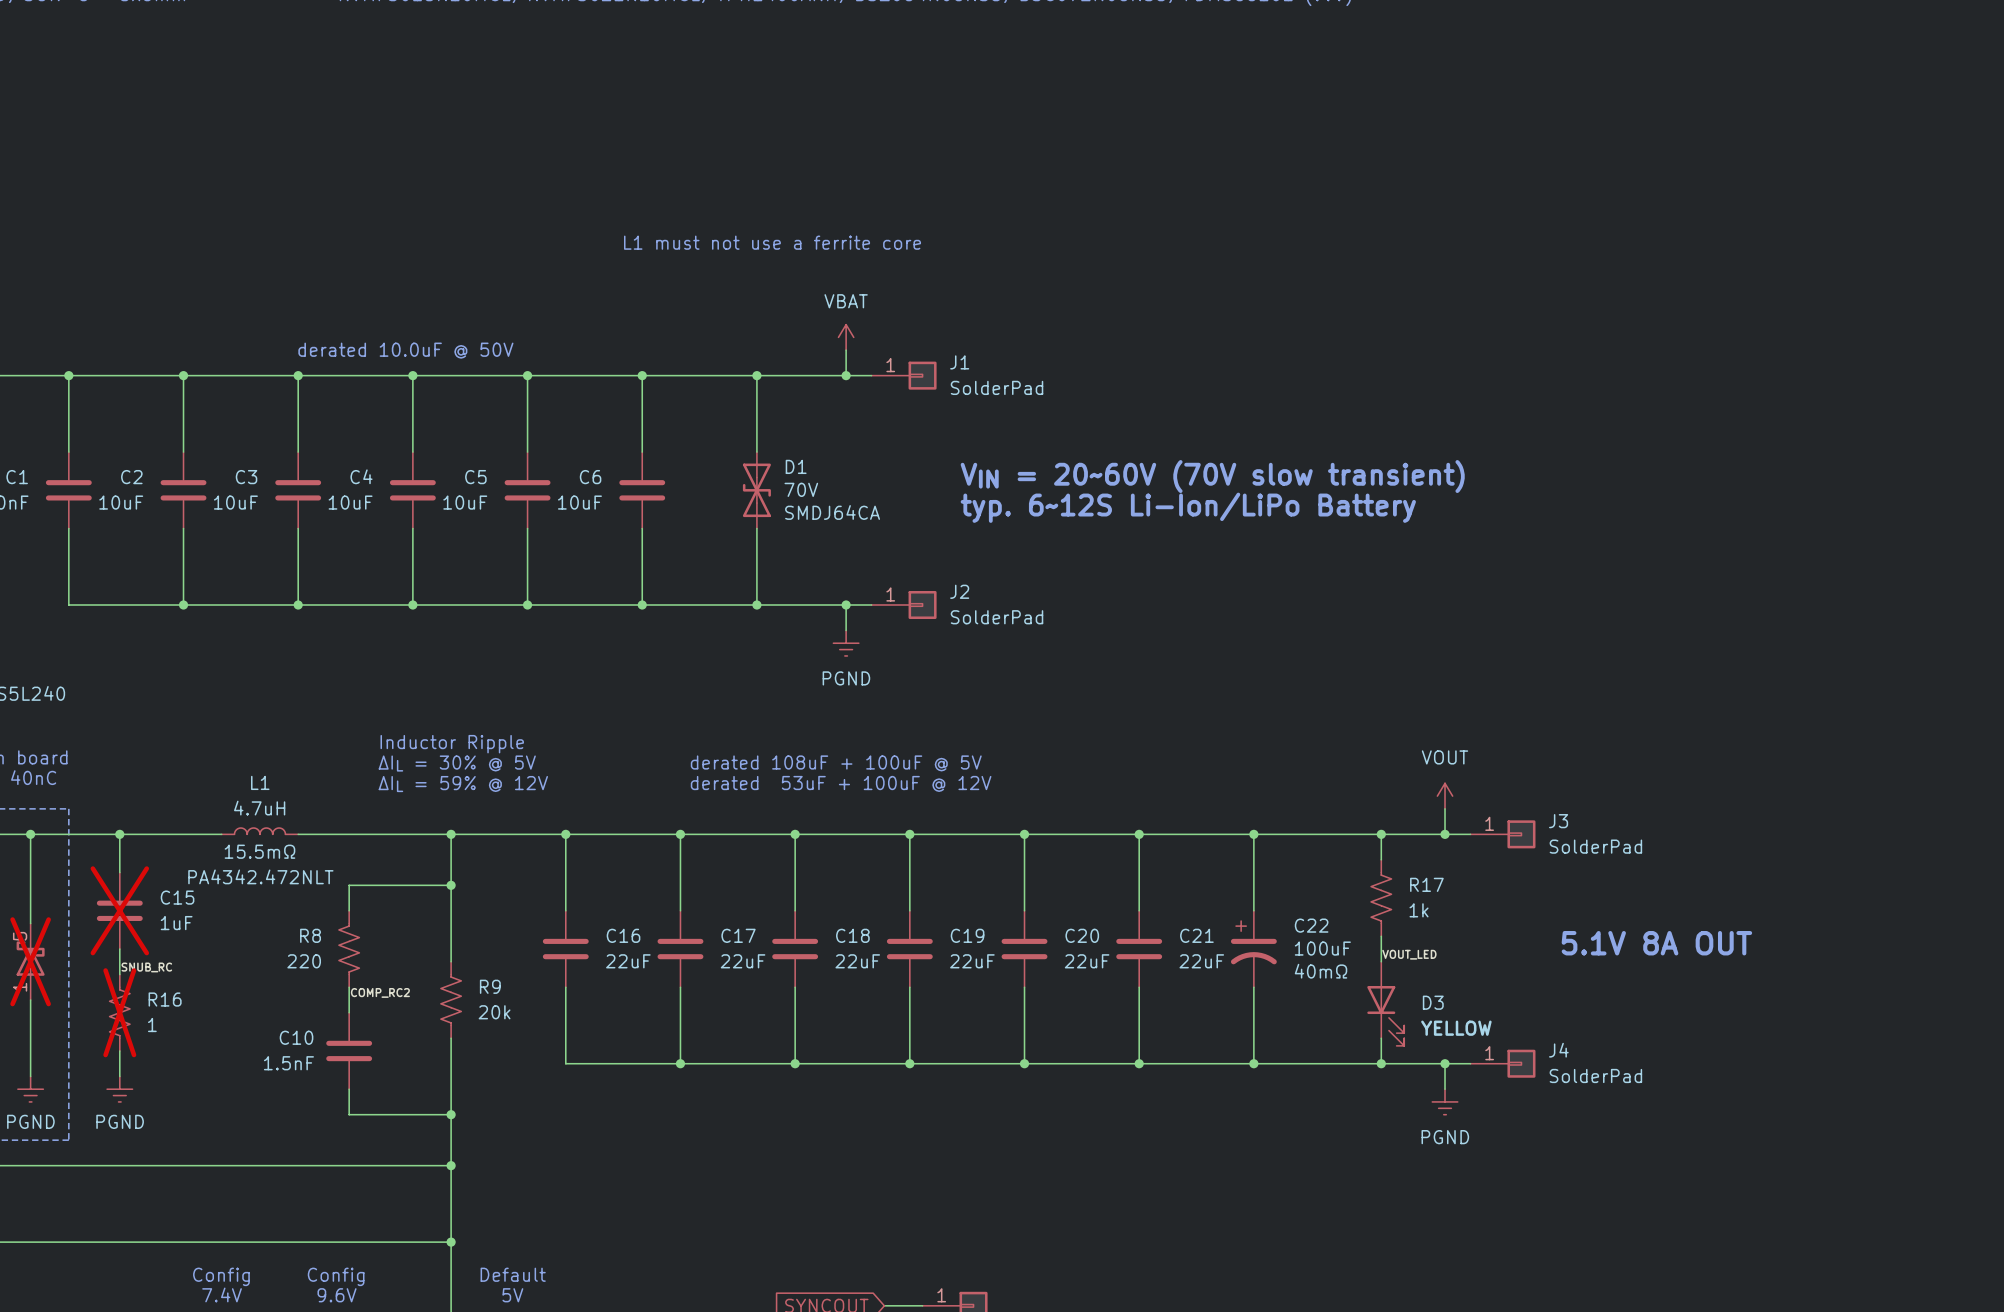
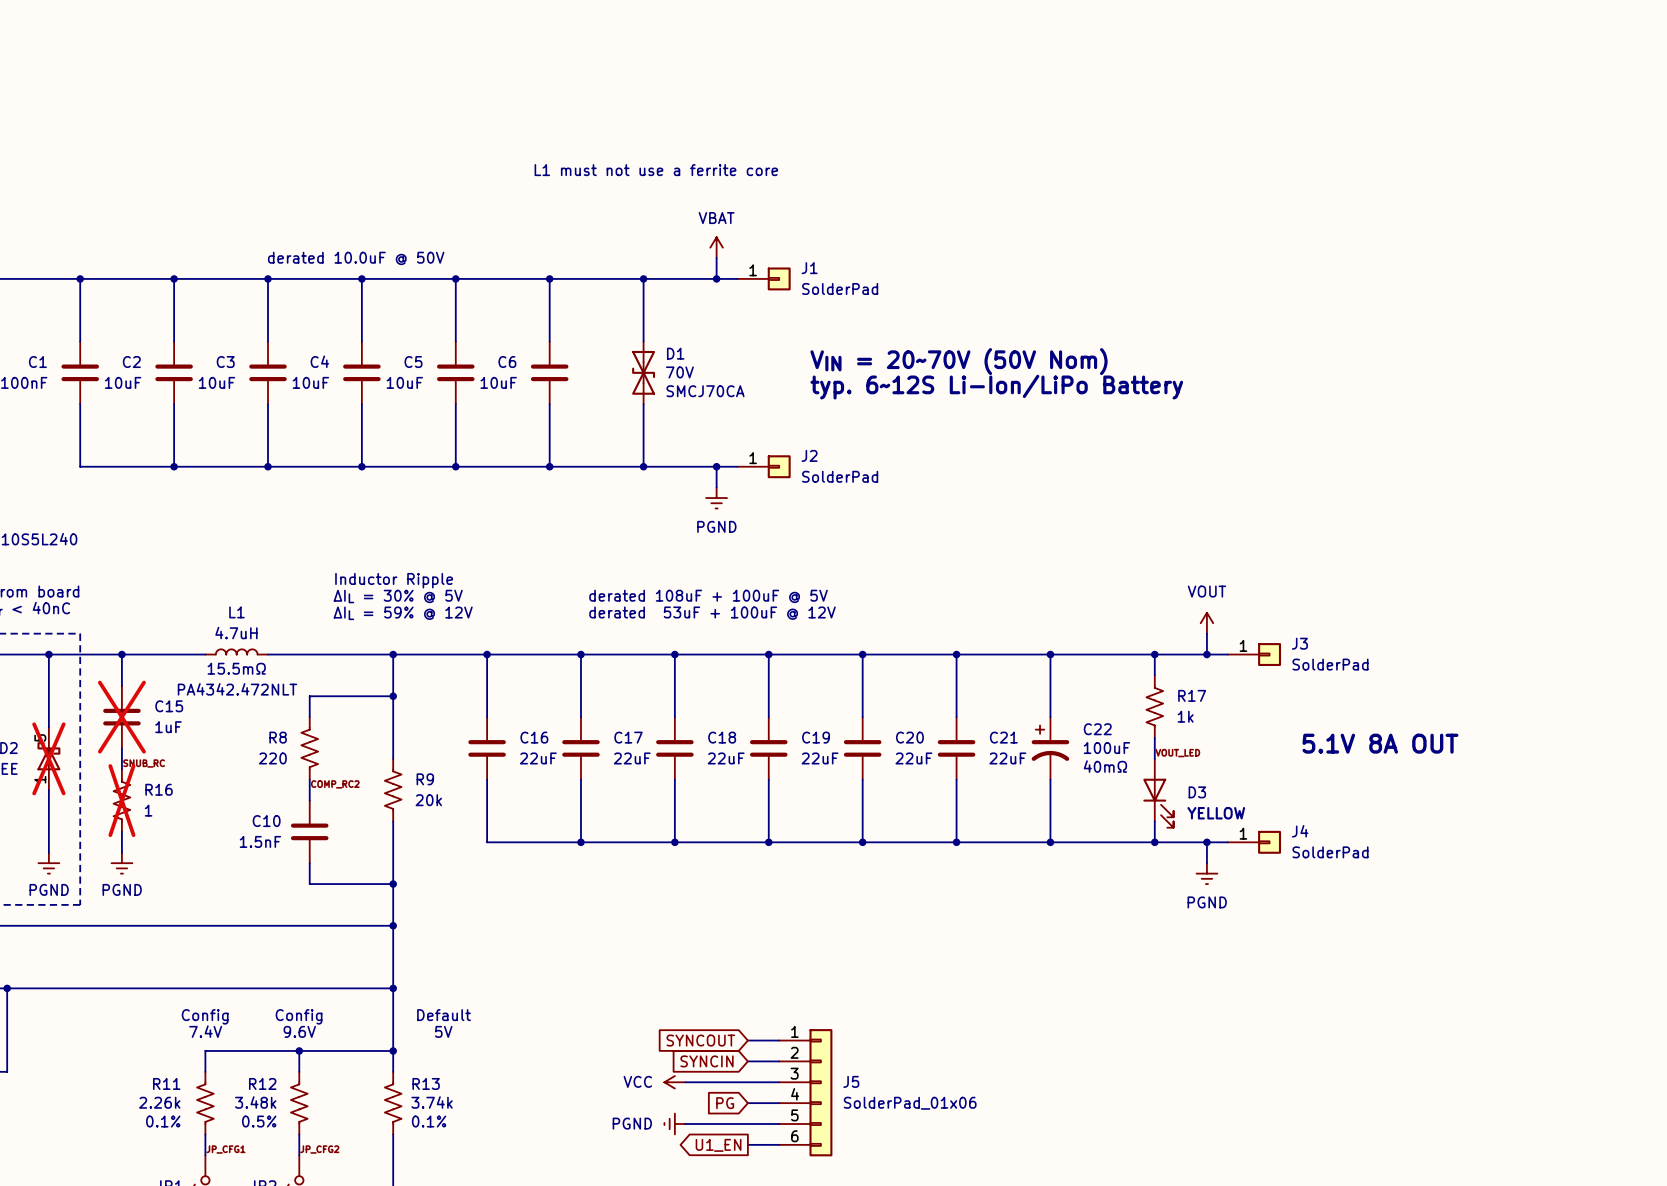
text: VIN = 20~60V (70V slow transient) (1212, 476) -> VIN = 20~70V (50V Nom) (958, 361)
D1 text: SMDJ64CA (832, 512) -> SMCJ70CA (705, 391)

